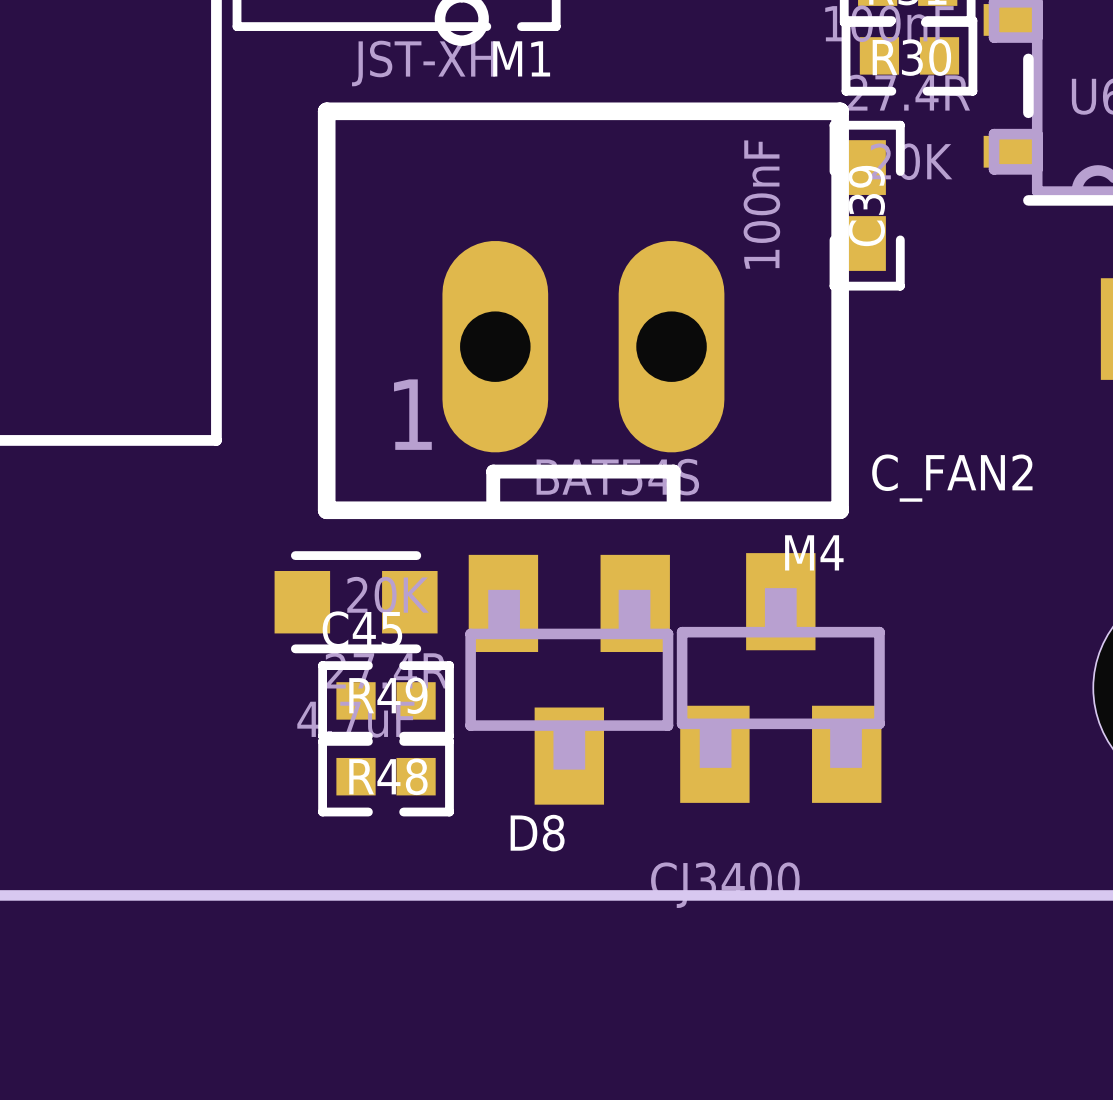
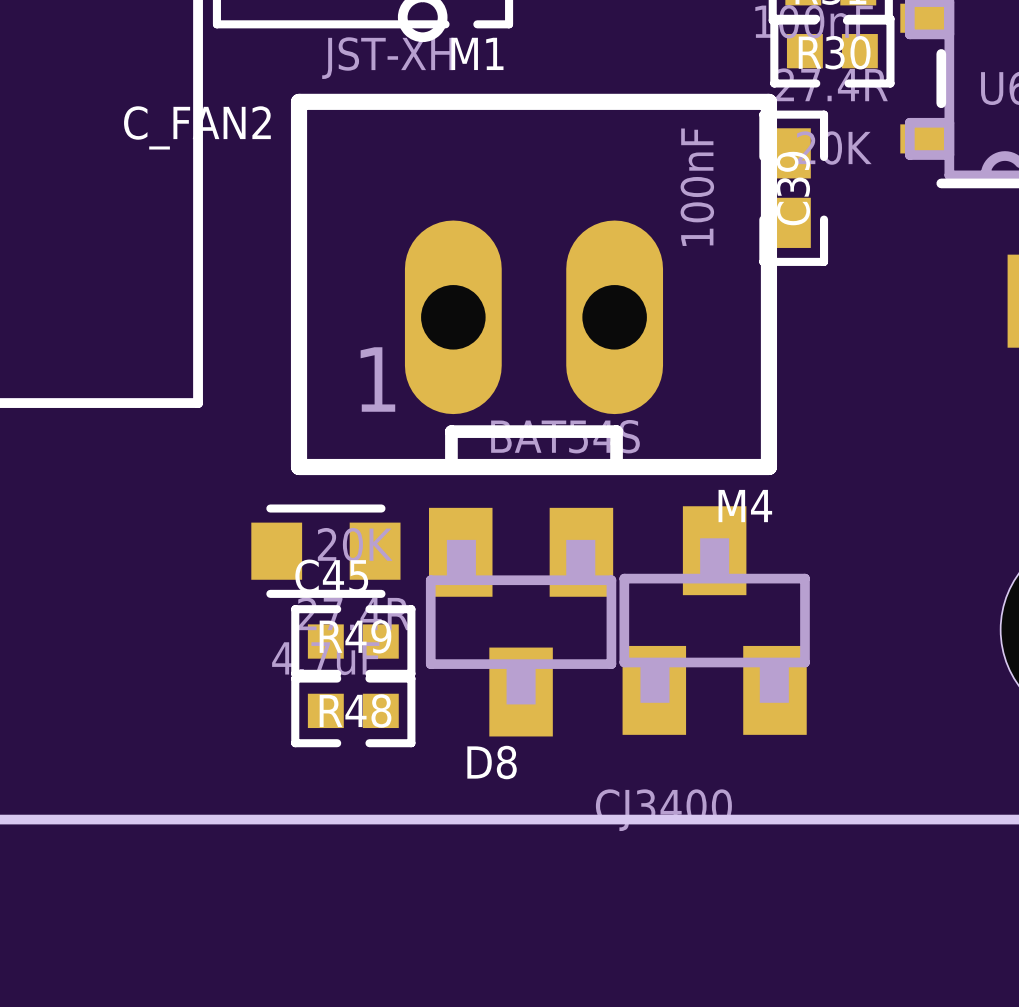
C_FAN2 name position: C_FAN2 (952, 478) -> C_FAN2 (197, 127)

